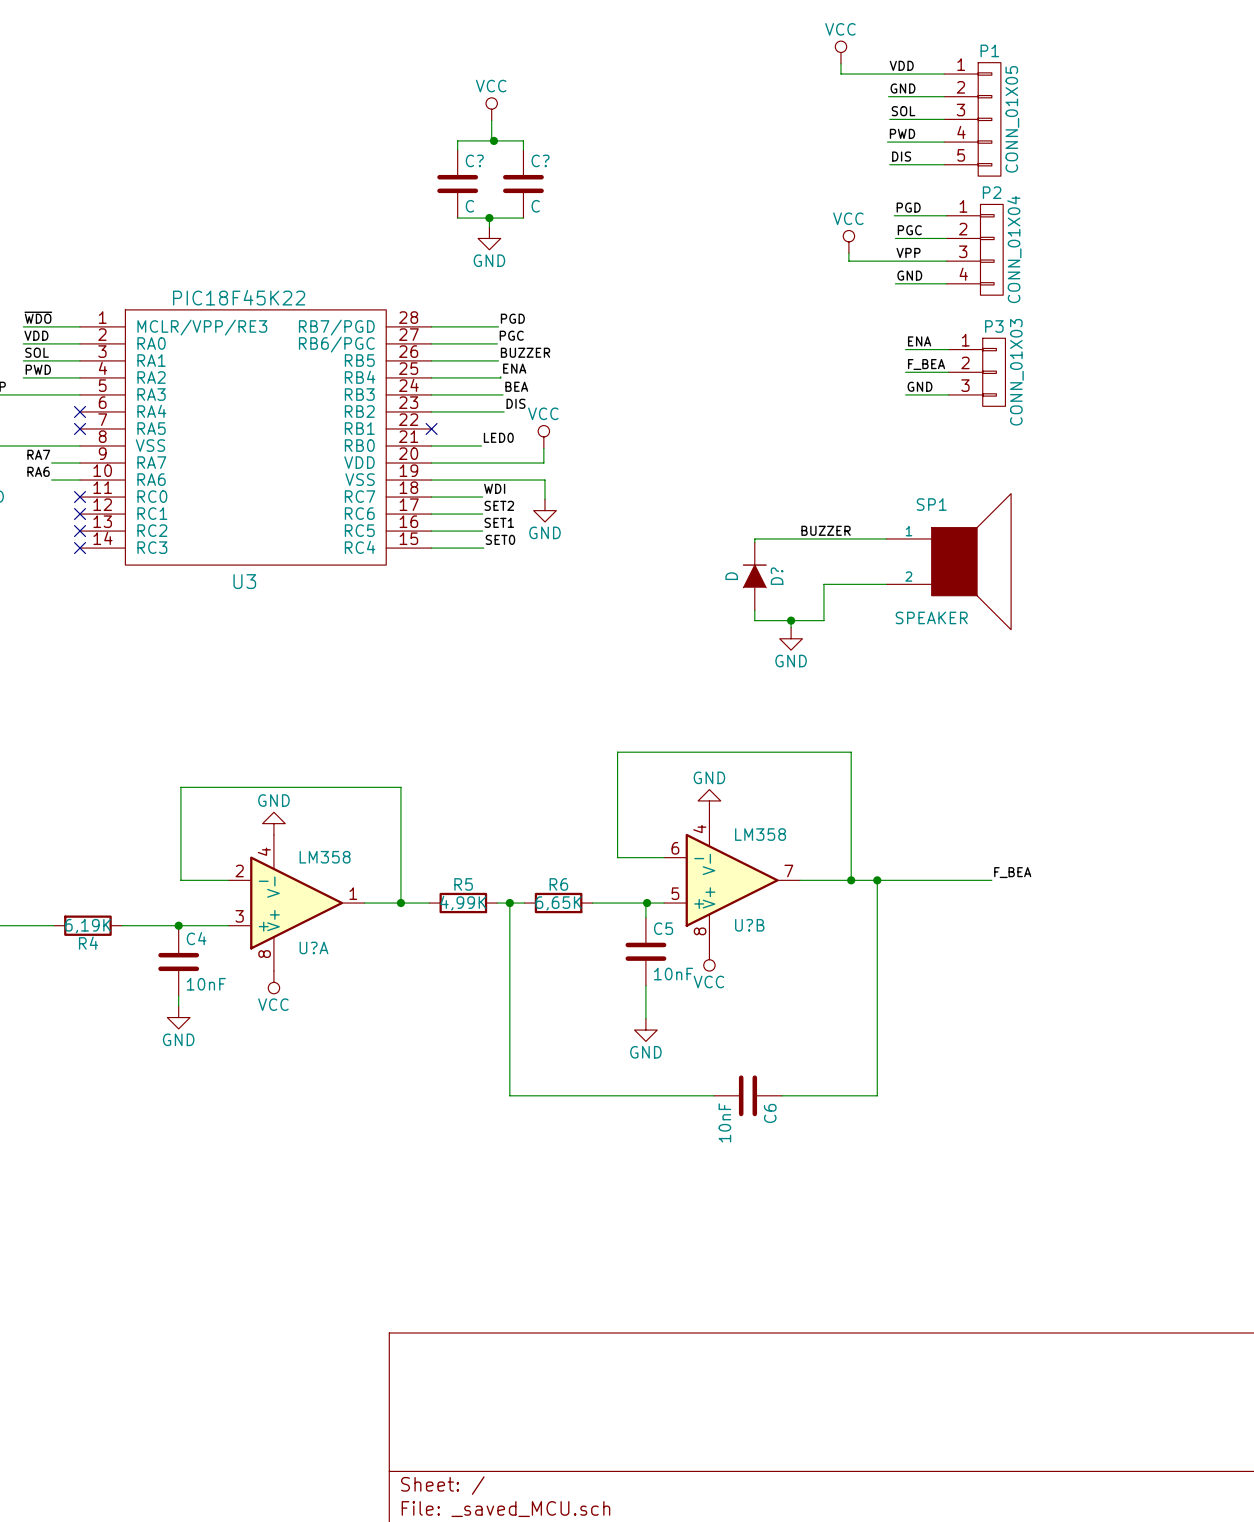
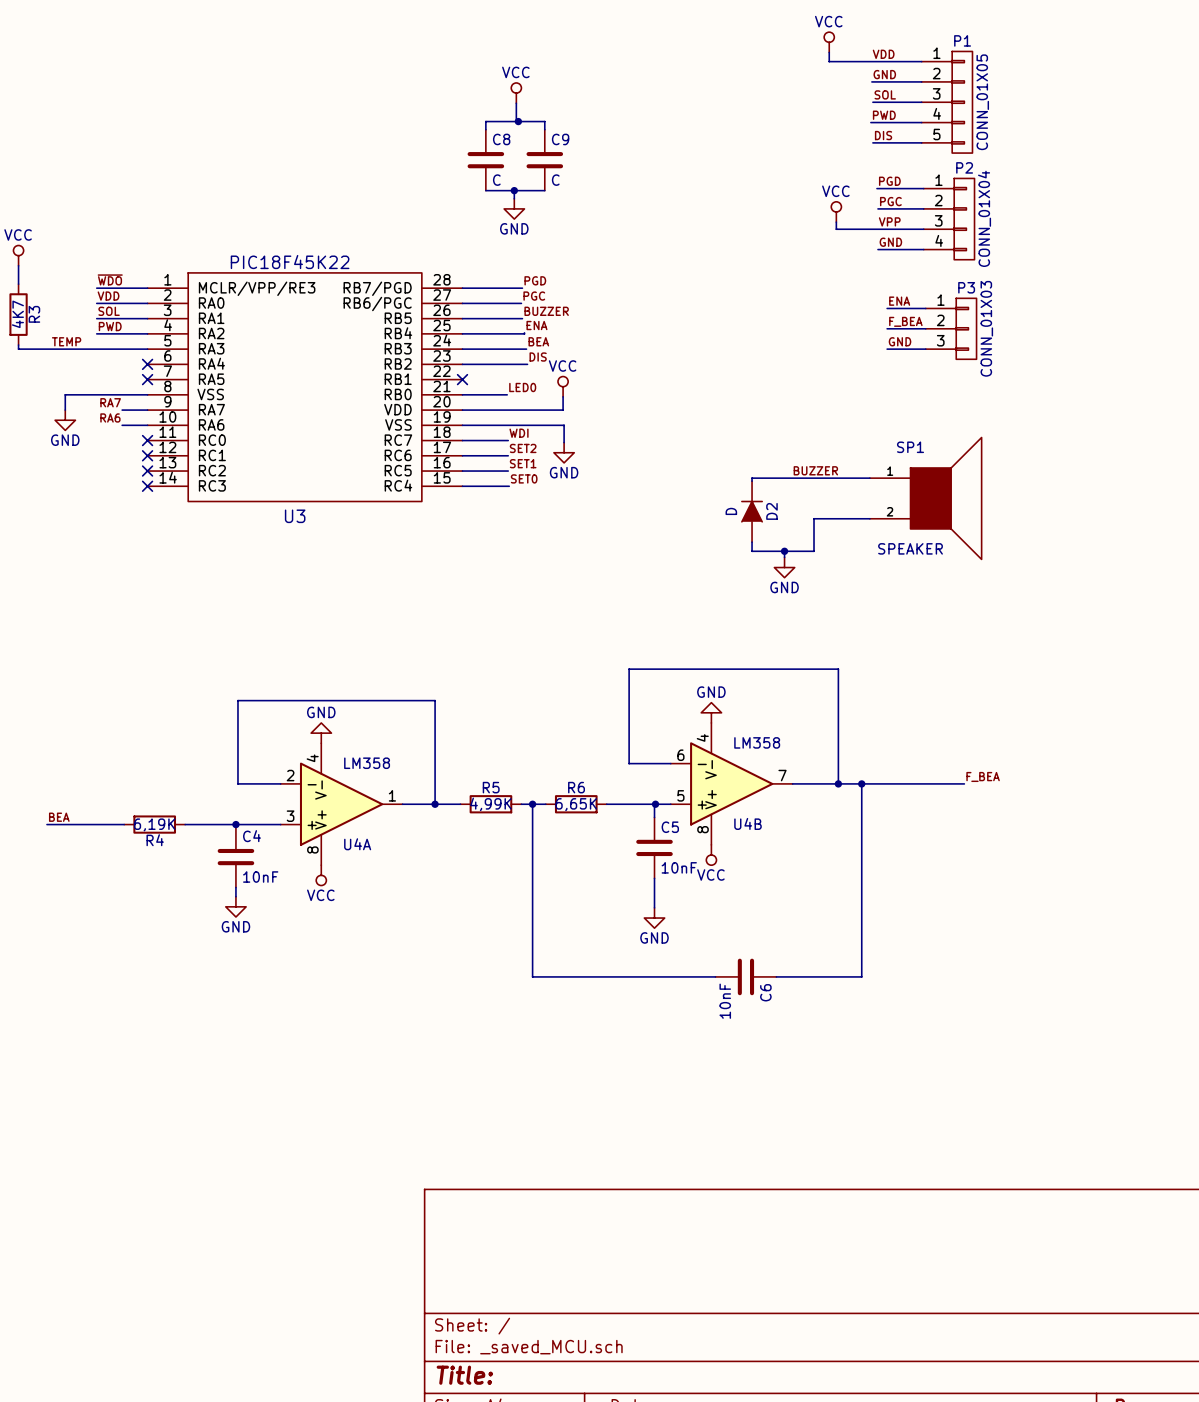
C? name: C? (474, 160) -> C8 (501, 139)
C? name: C? (540, 160) -> C9 (560, 139)
D? name: D? (777, 576) -> D2 (771, 511)
U?B name: U?B (749, 925) -> U4B (747, 823)
U?A name: U?A (313, 947) -> U4A (357, 844)

